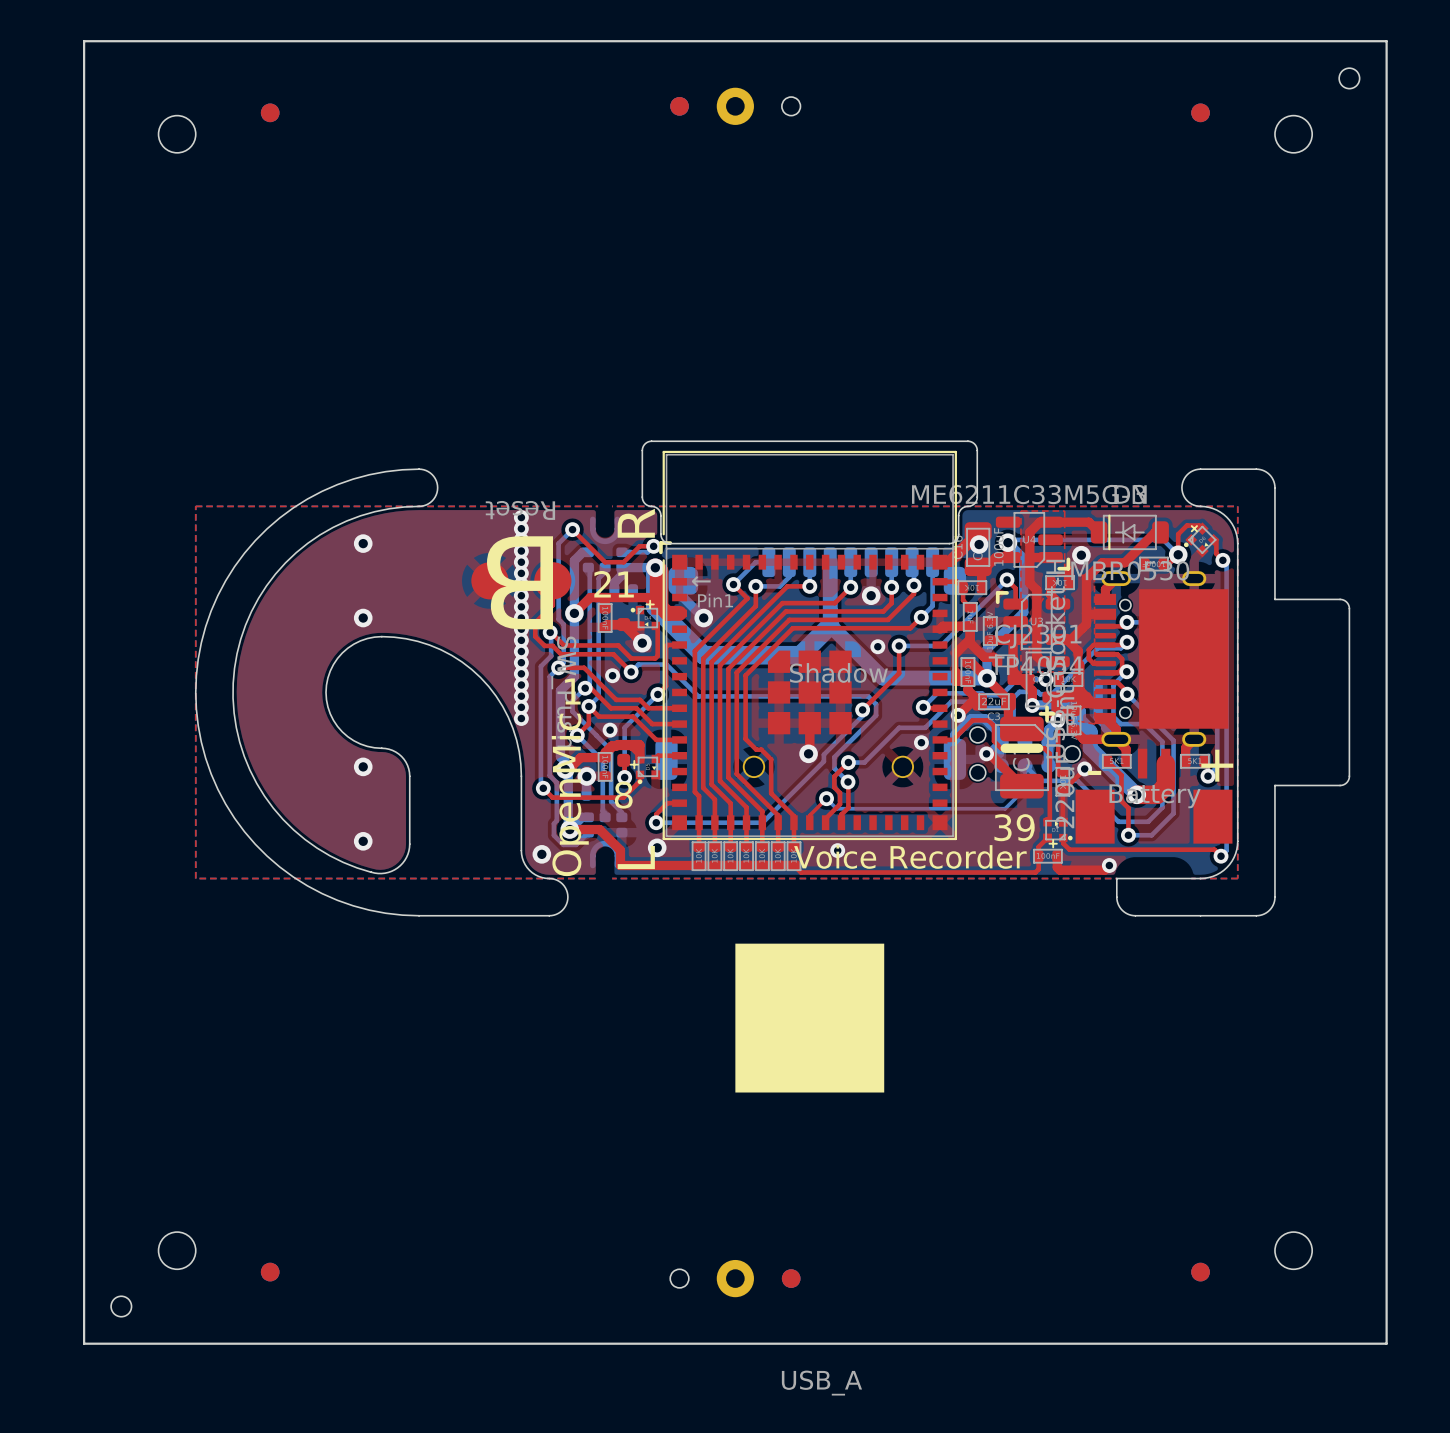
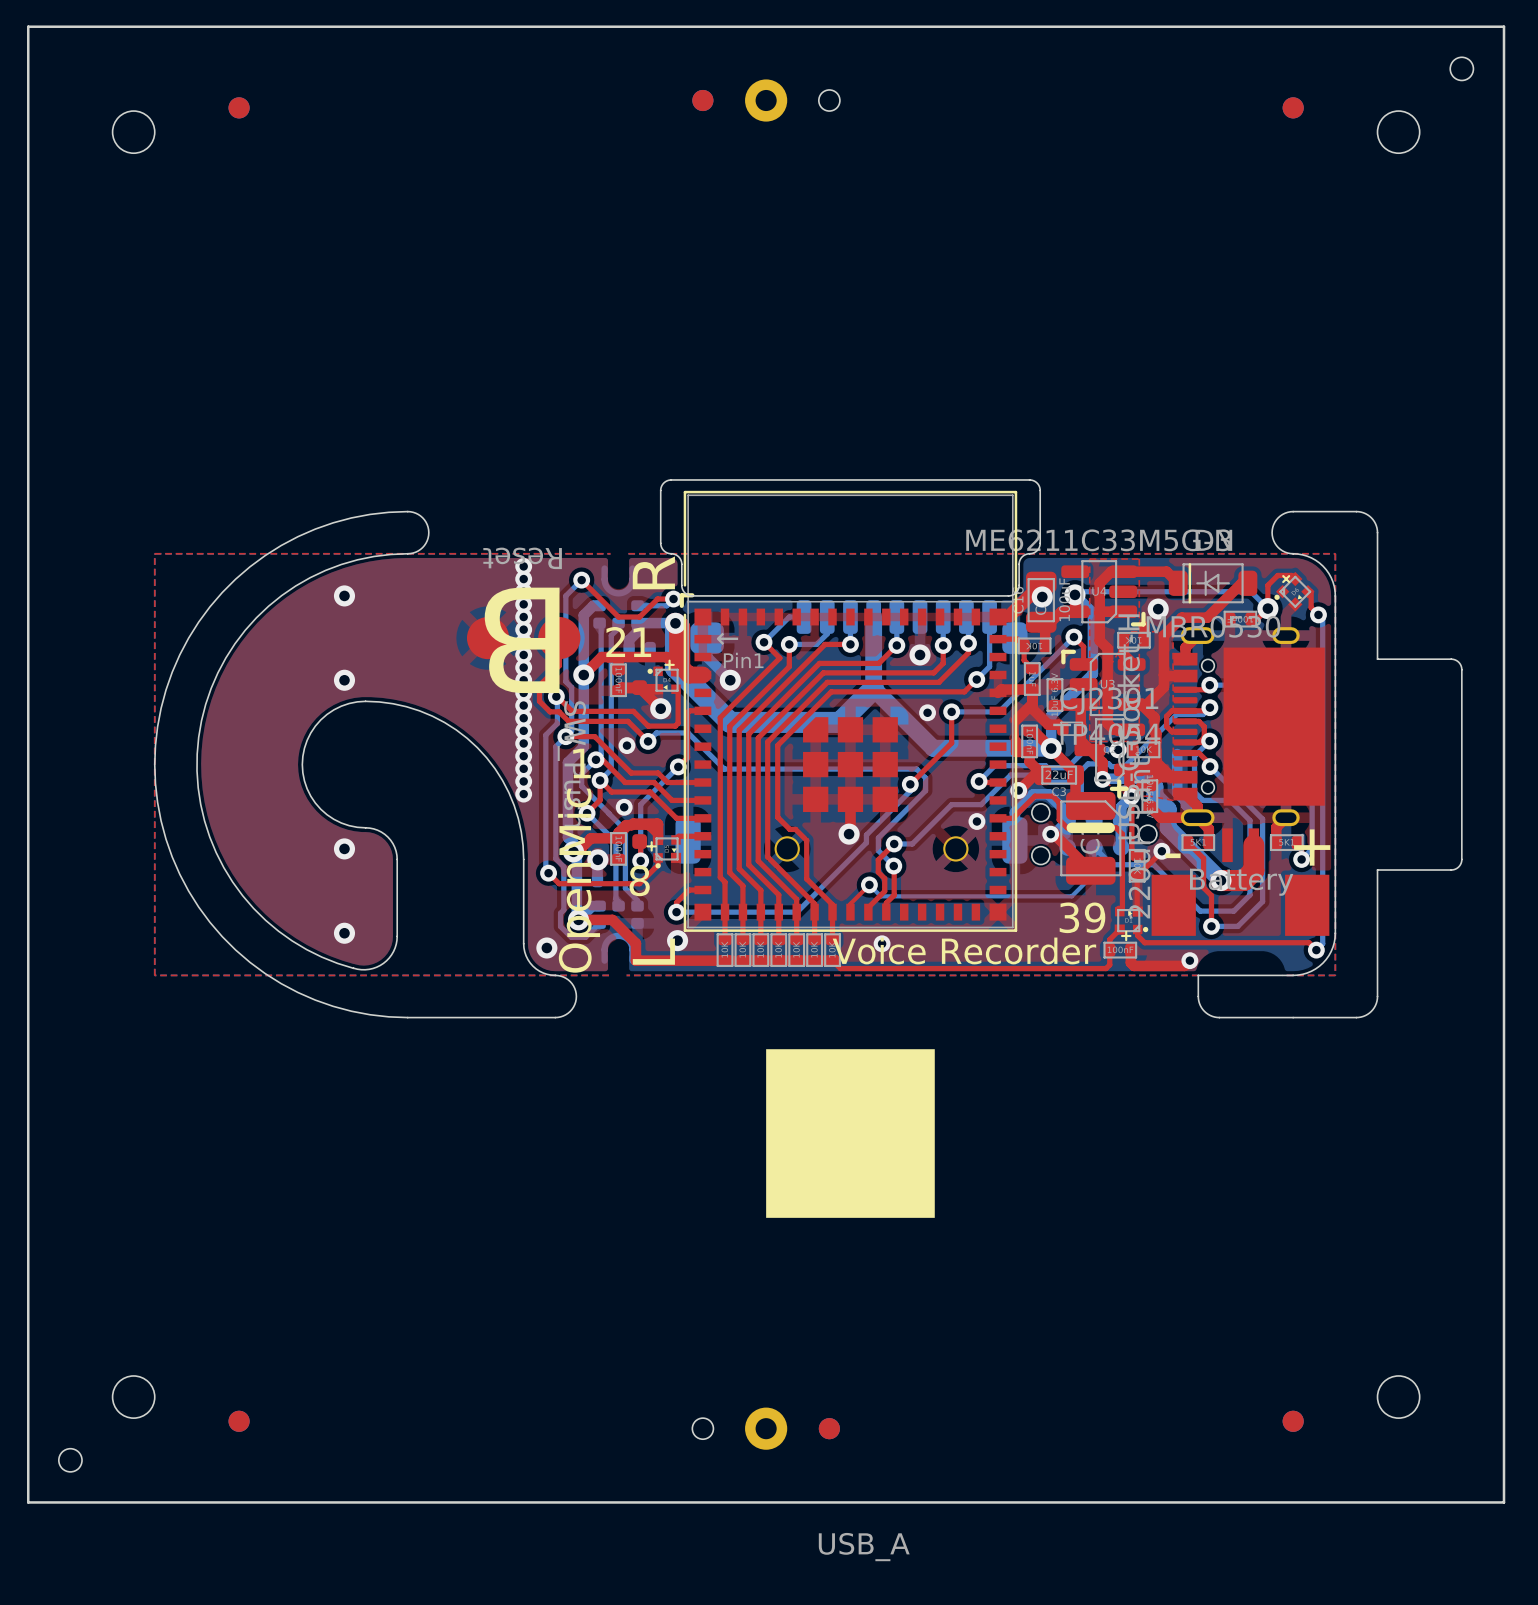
drawing: [789, 663, 888, 683] -> none

